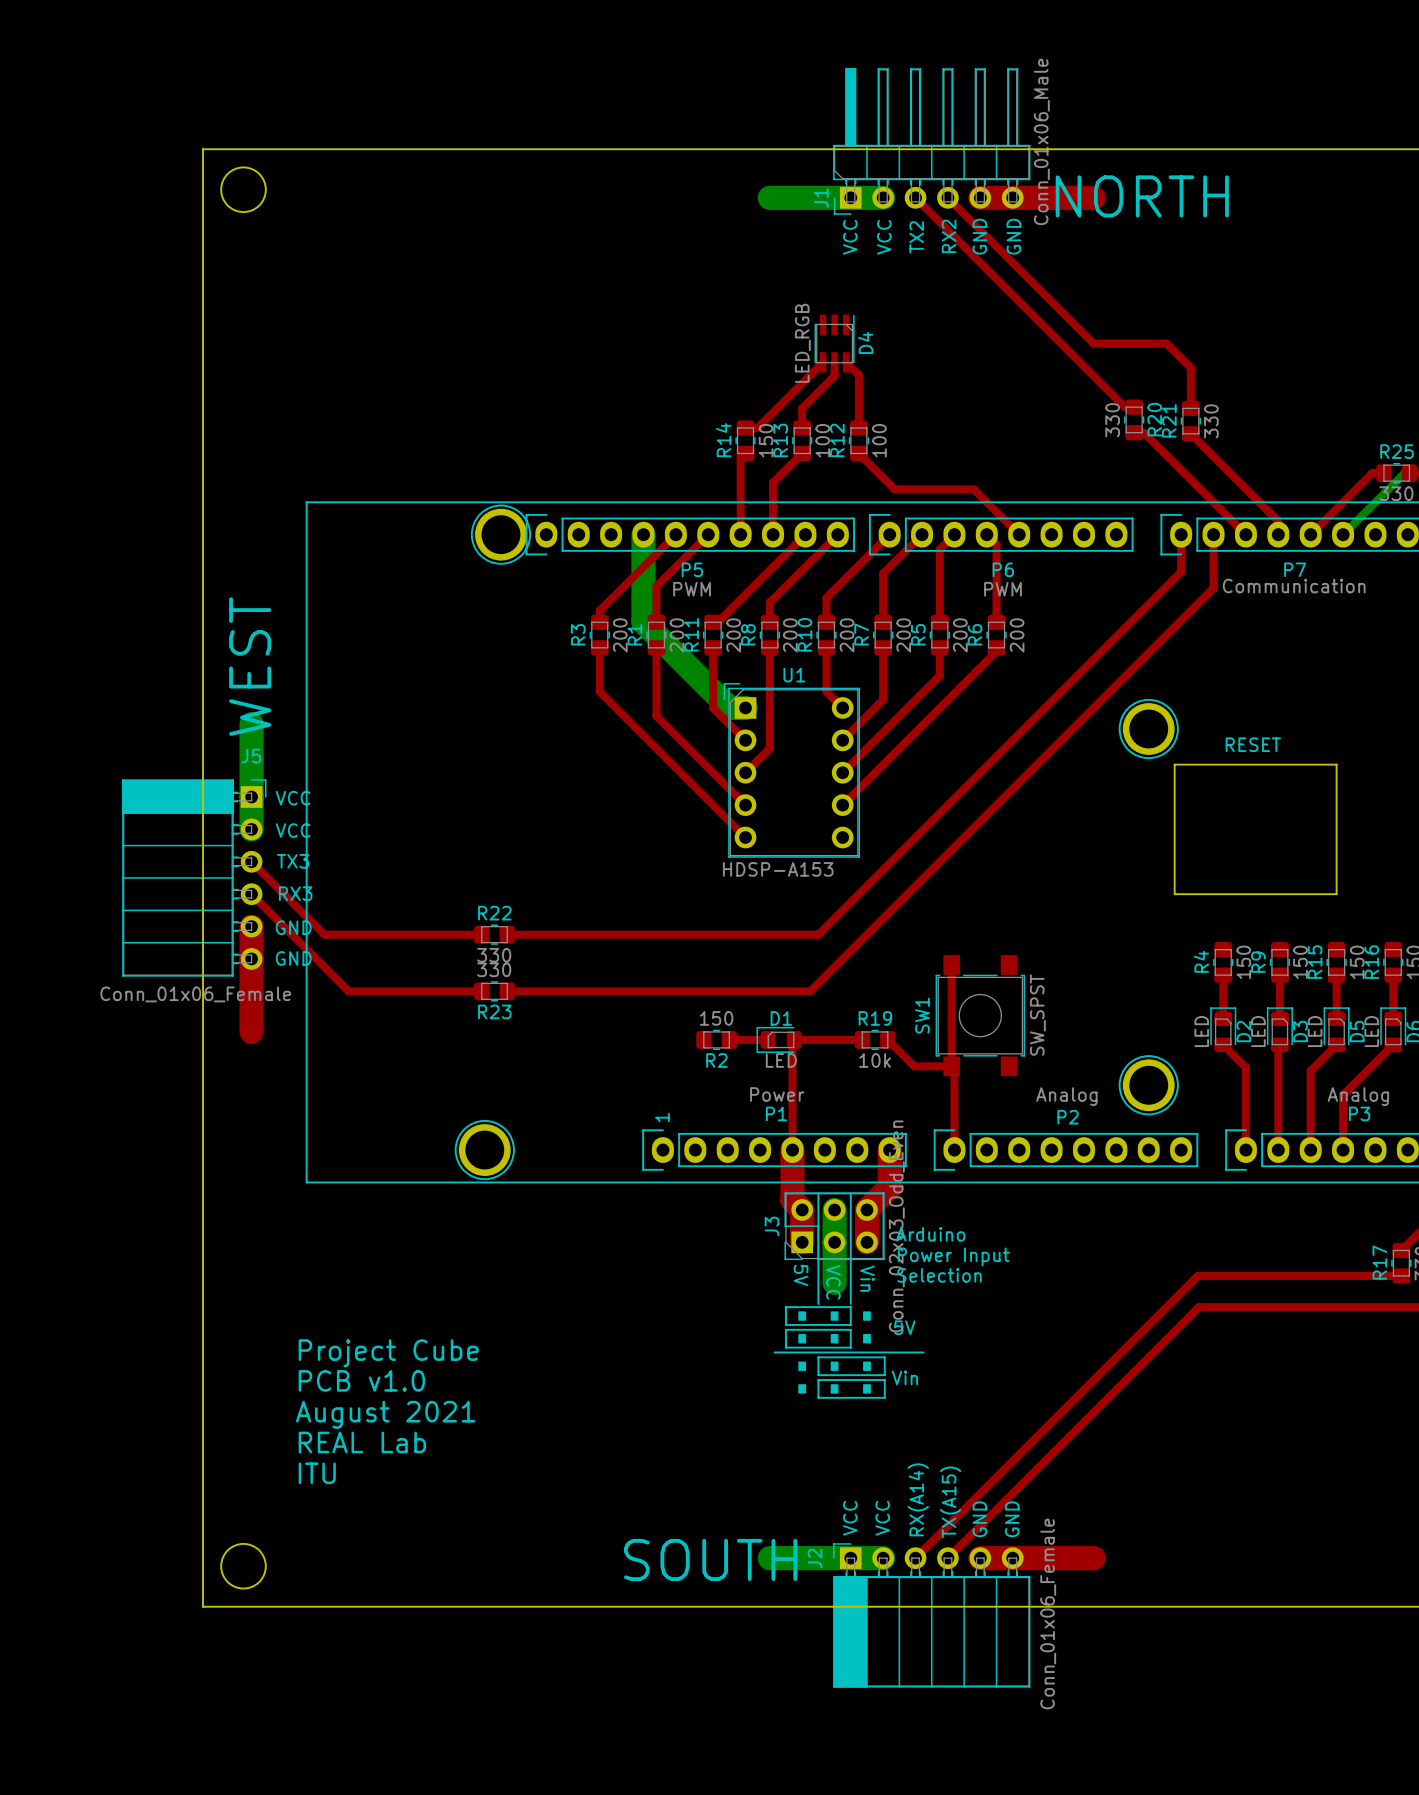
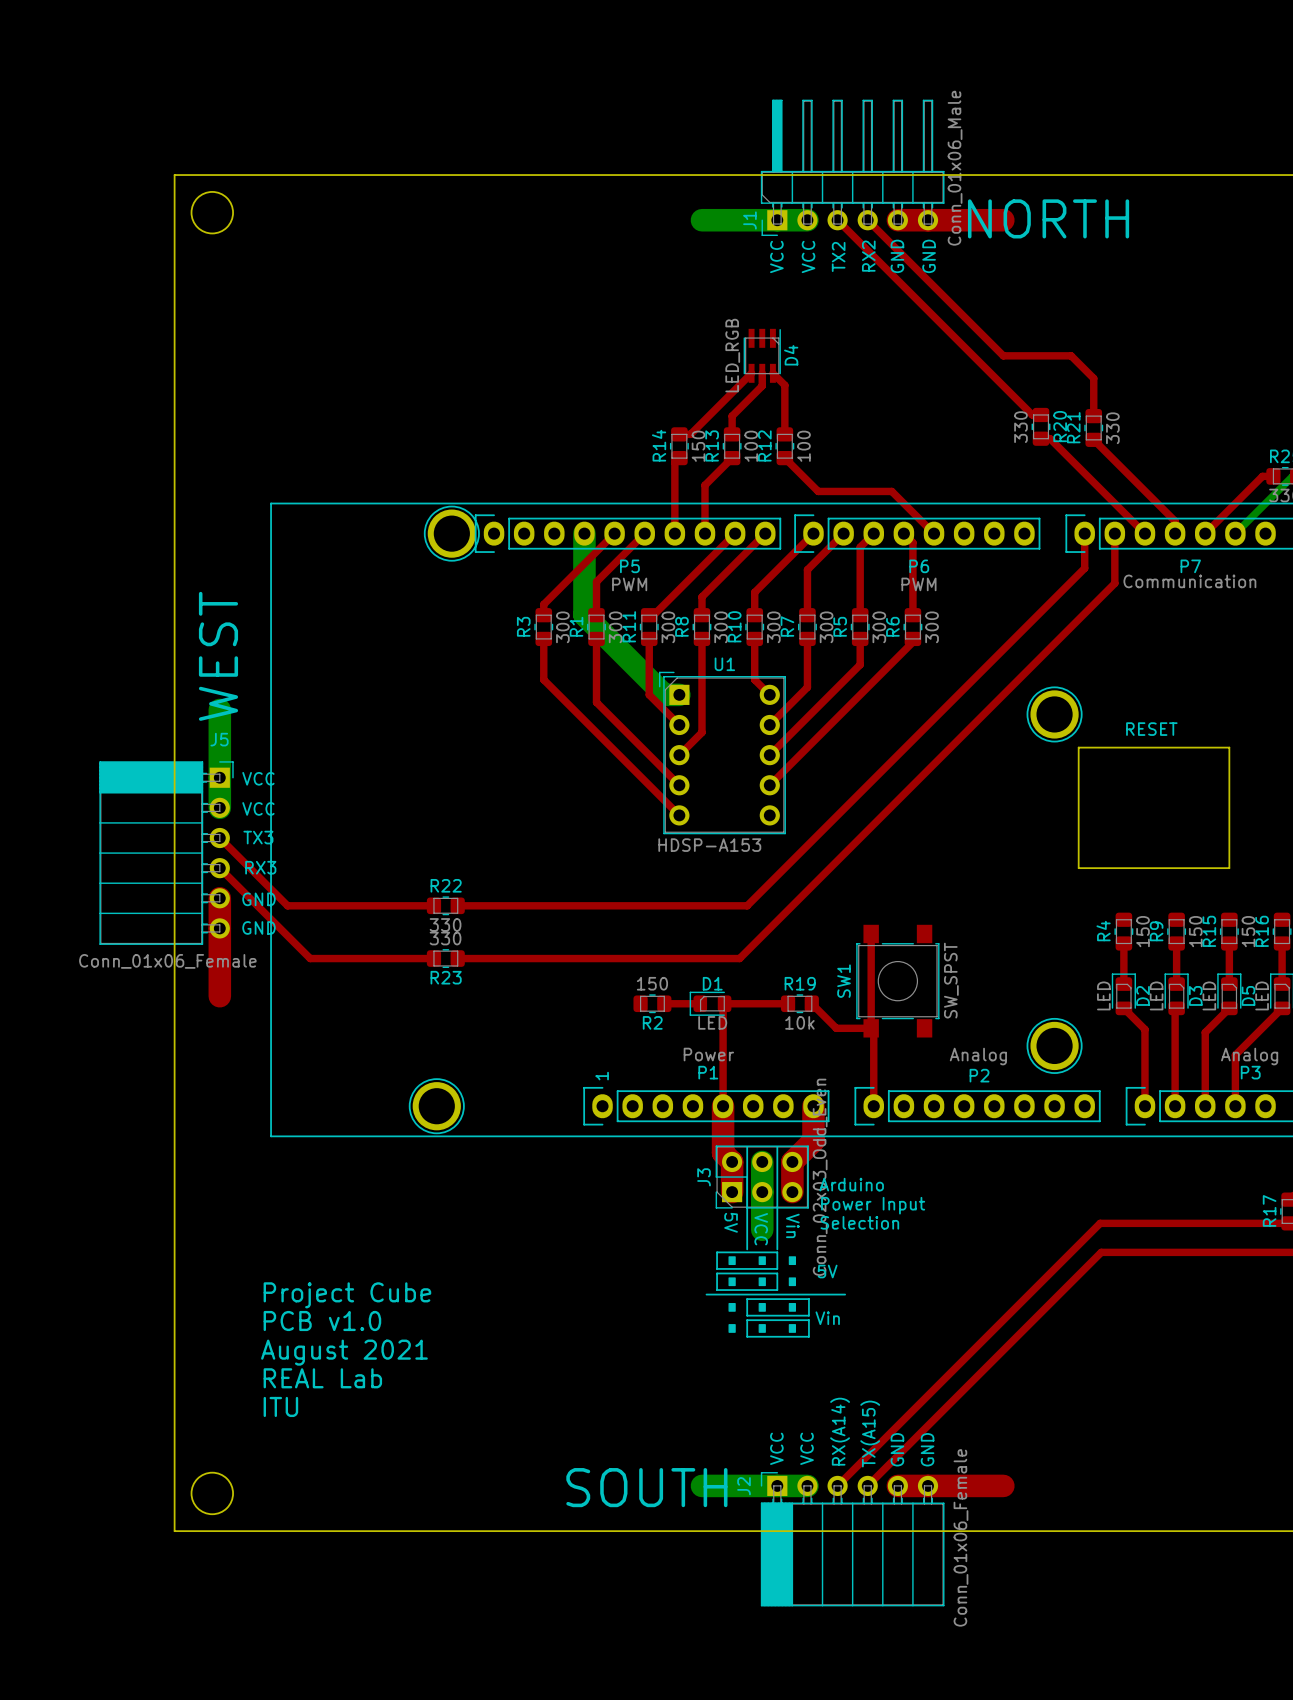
R3 value: 200 (620, 635) -> 300 (562, 627)
R1 value: 200 (677, 635) -> 300 (615, 627)
R11 value: 200 (733, 635) -> 300 (668, 627)
R8 value: 200 (790, 635) -> 300 (721, 627)
R10 value: 200 (847, 635) -> 300 (773, 627)
R7 value: 200 (903, 635) -> 300 (826, 627)
R5 value: 200 (960, 635) -> 300 (879, 627)
R6 value: 200 (1017, 635) -> 300 (932, 627)

